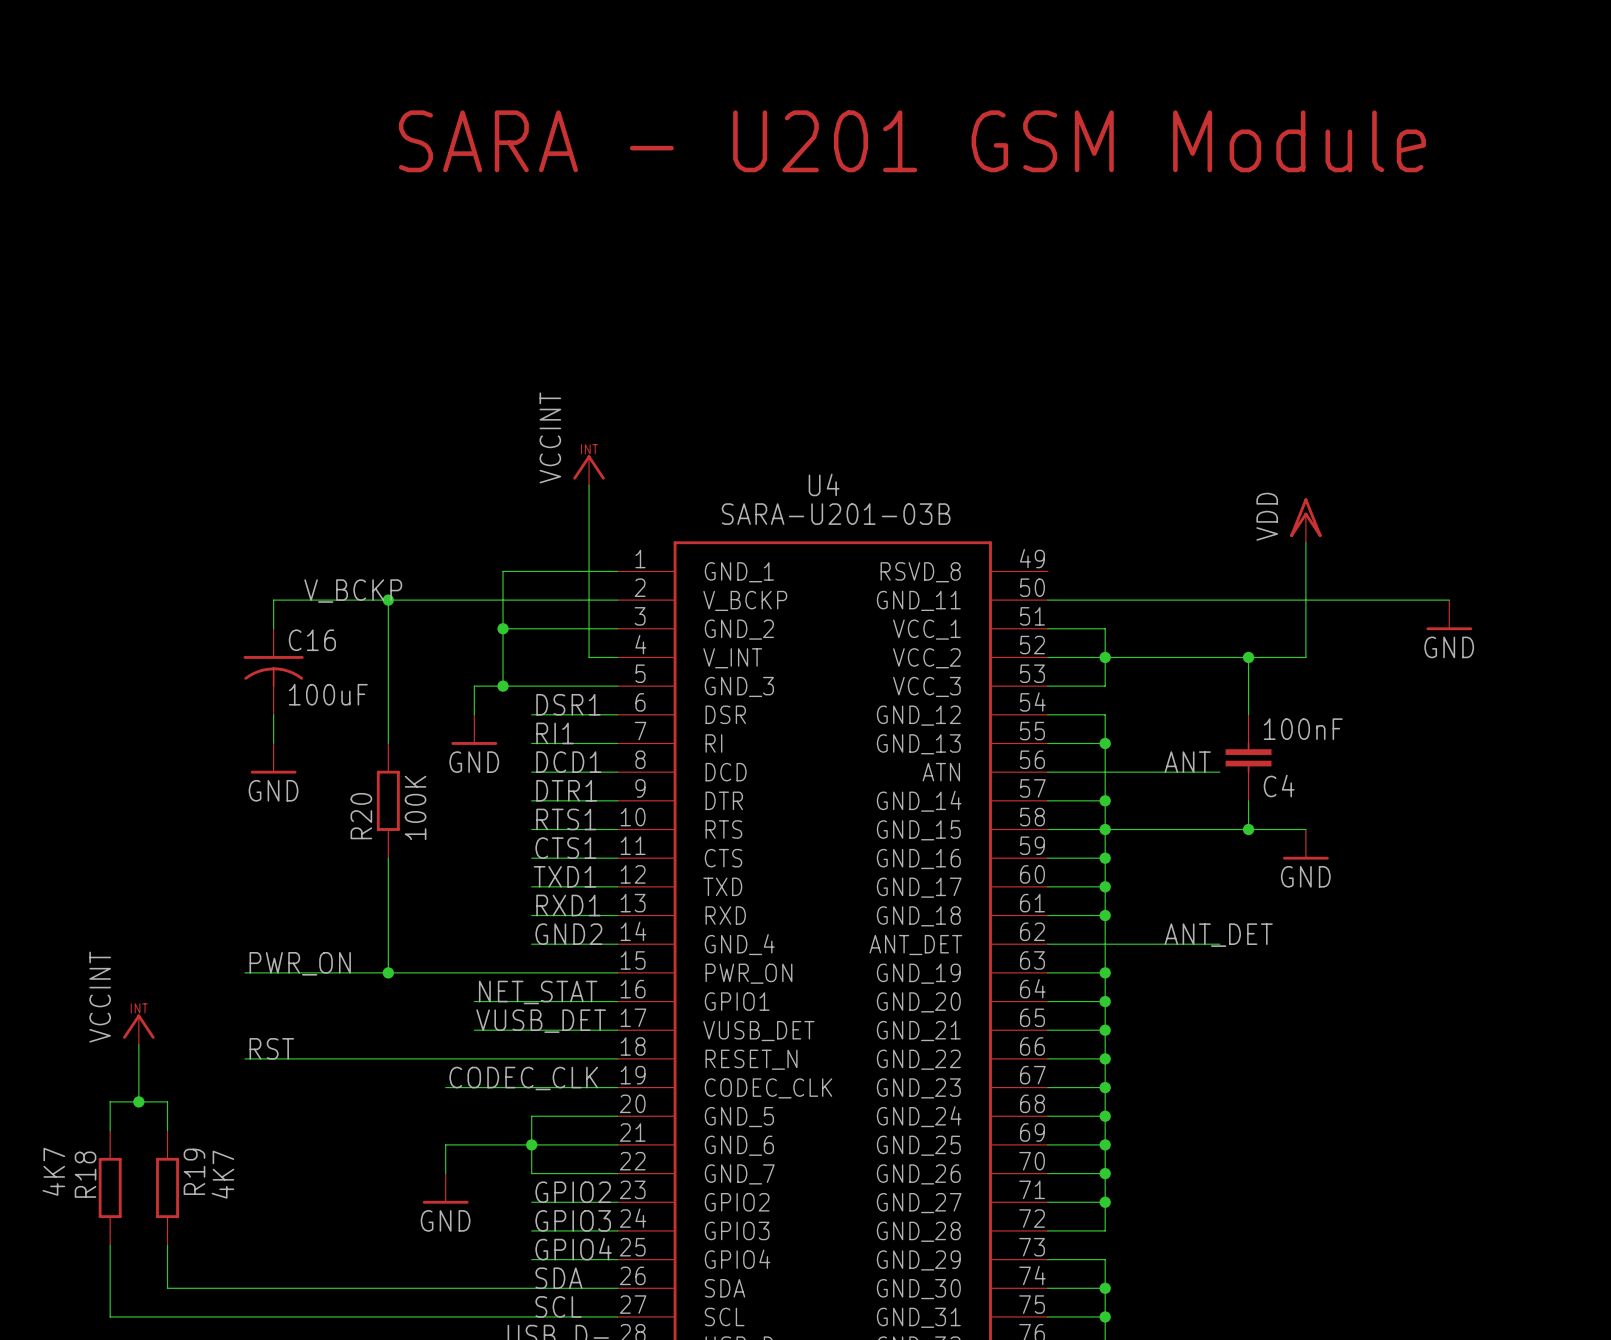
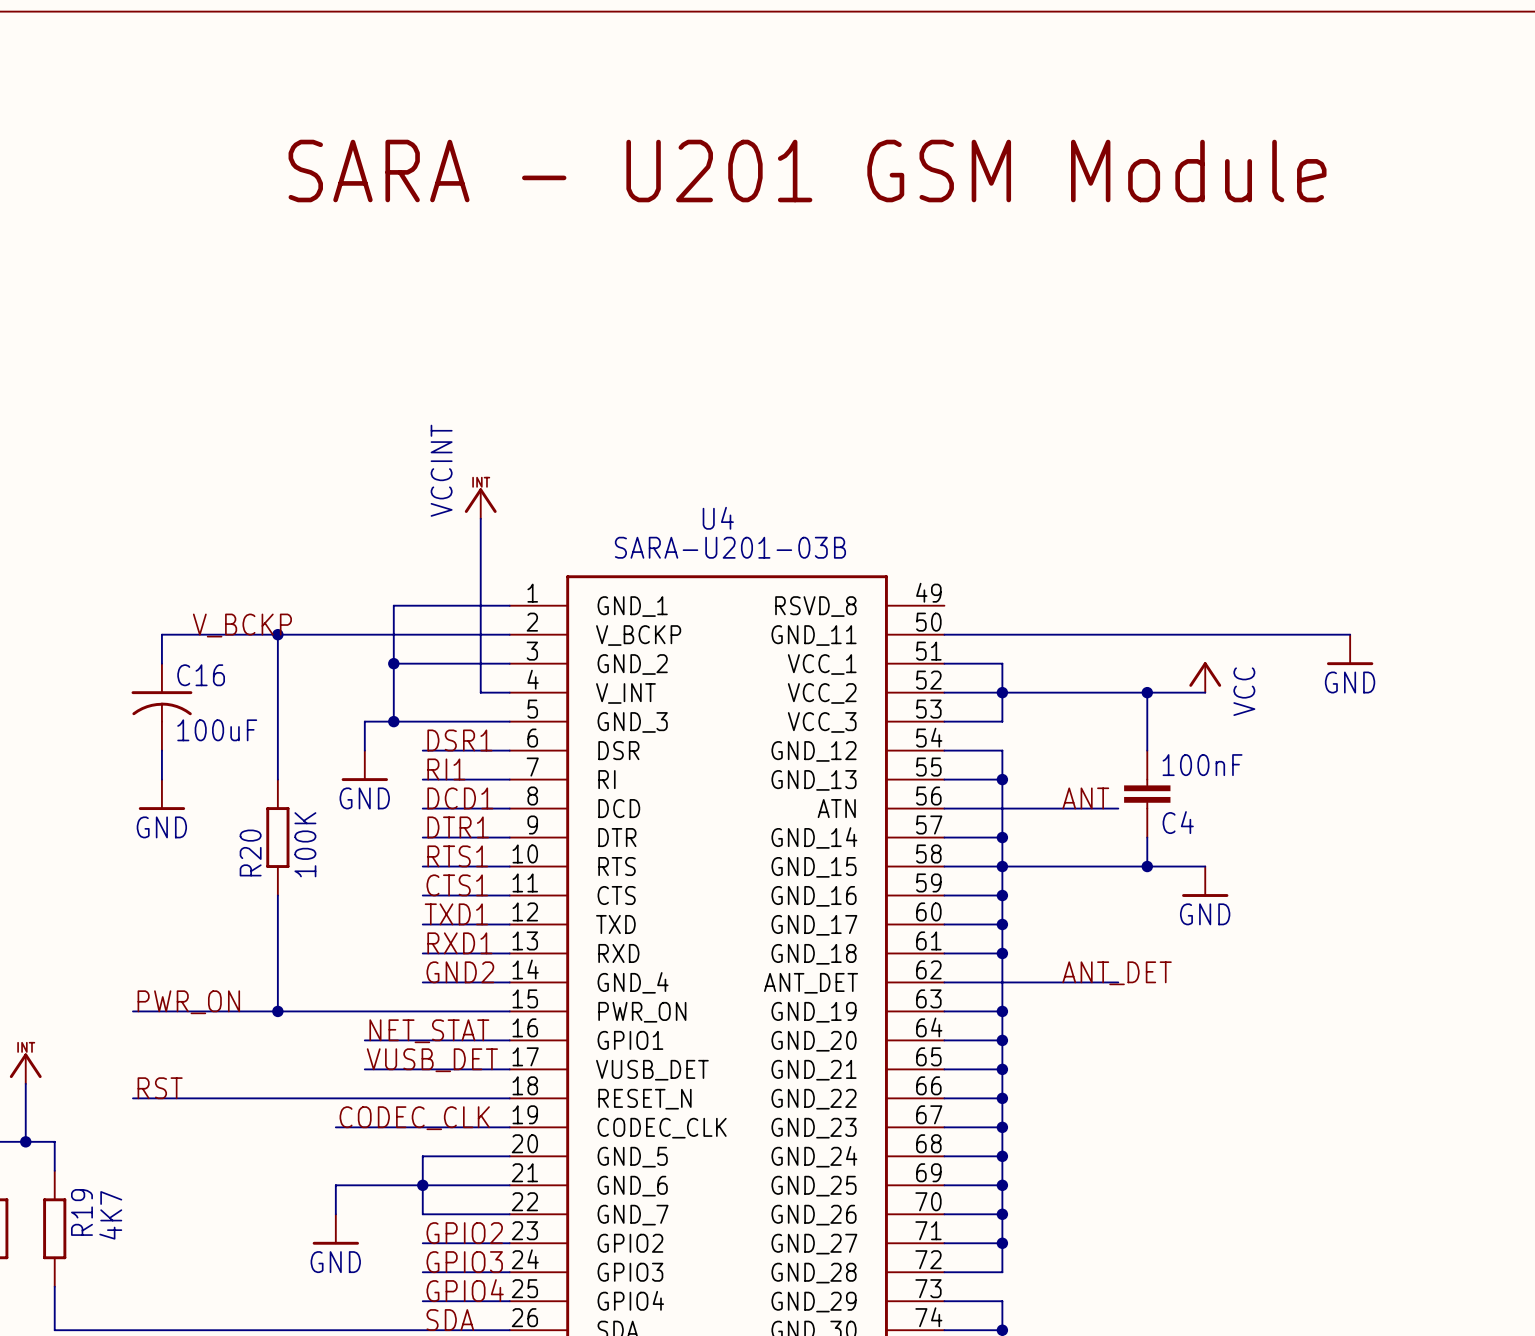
power symbol: VDD (1305, 520) -> none
wire: (1305, 542) (1305, 657) -> none
power symbol: none -> VCC (1205, 677)

